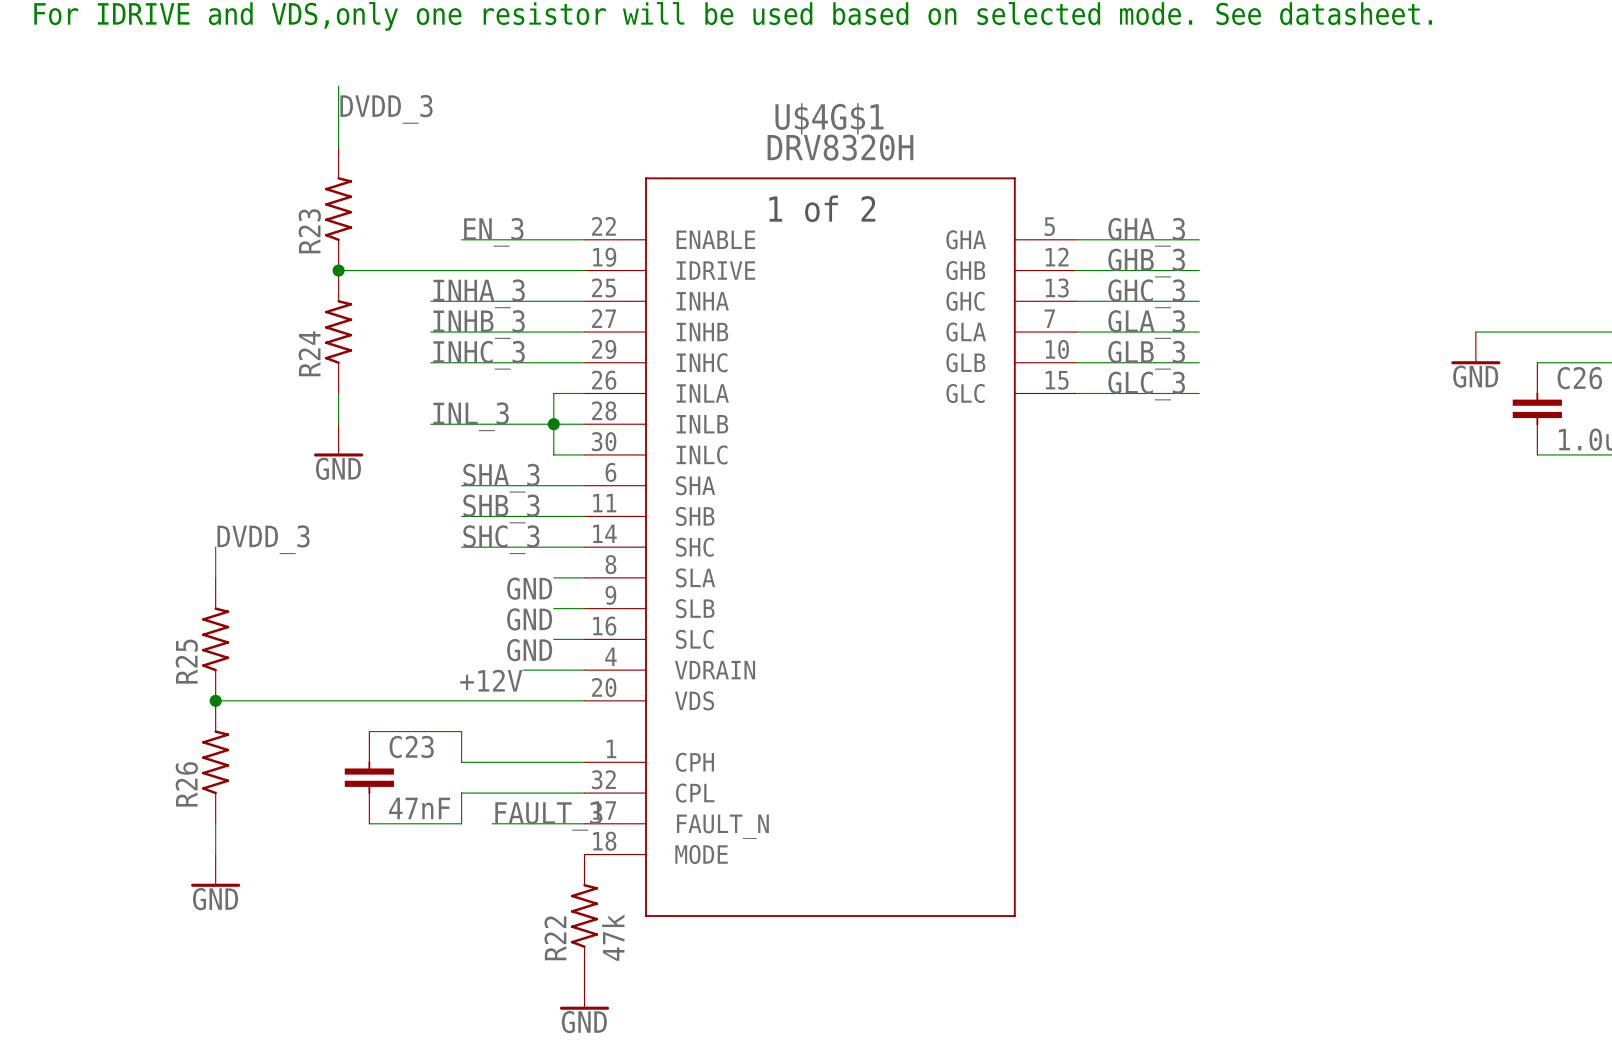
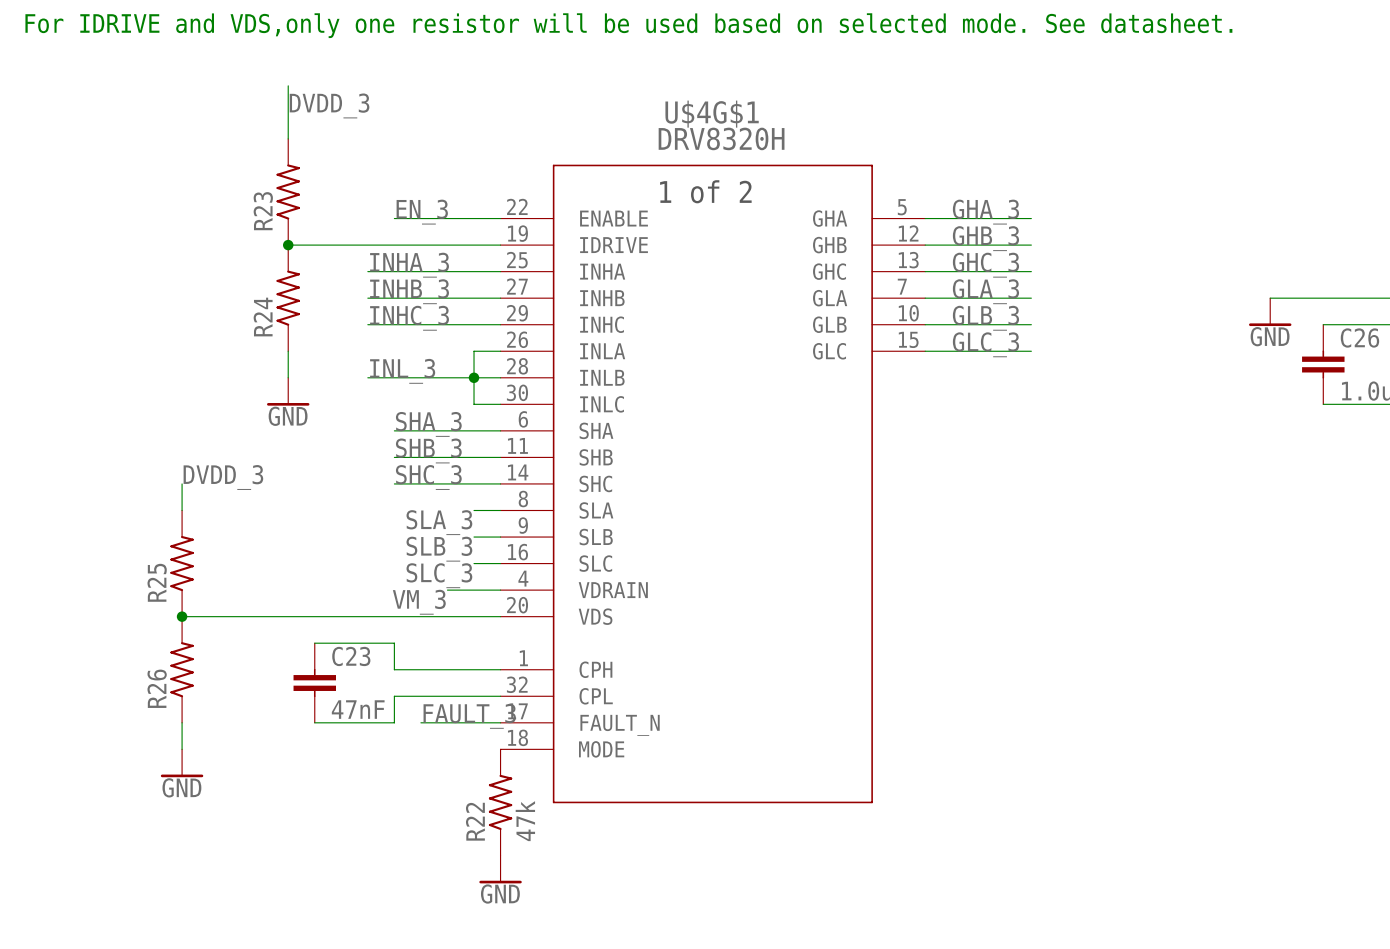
label: GND (529, 588) -> SLA_3 (439, 522)
label: GND (529, 619) -> SLB_3 (439, 549)
label: GND (529, 650) -> SLC_3 (439, 575)
label: +12V (491, 680) -> VM_3 (419, 602)

